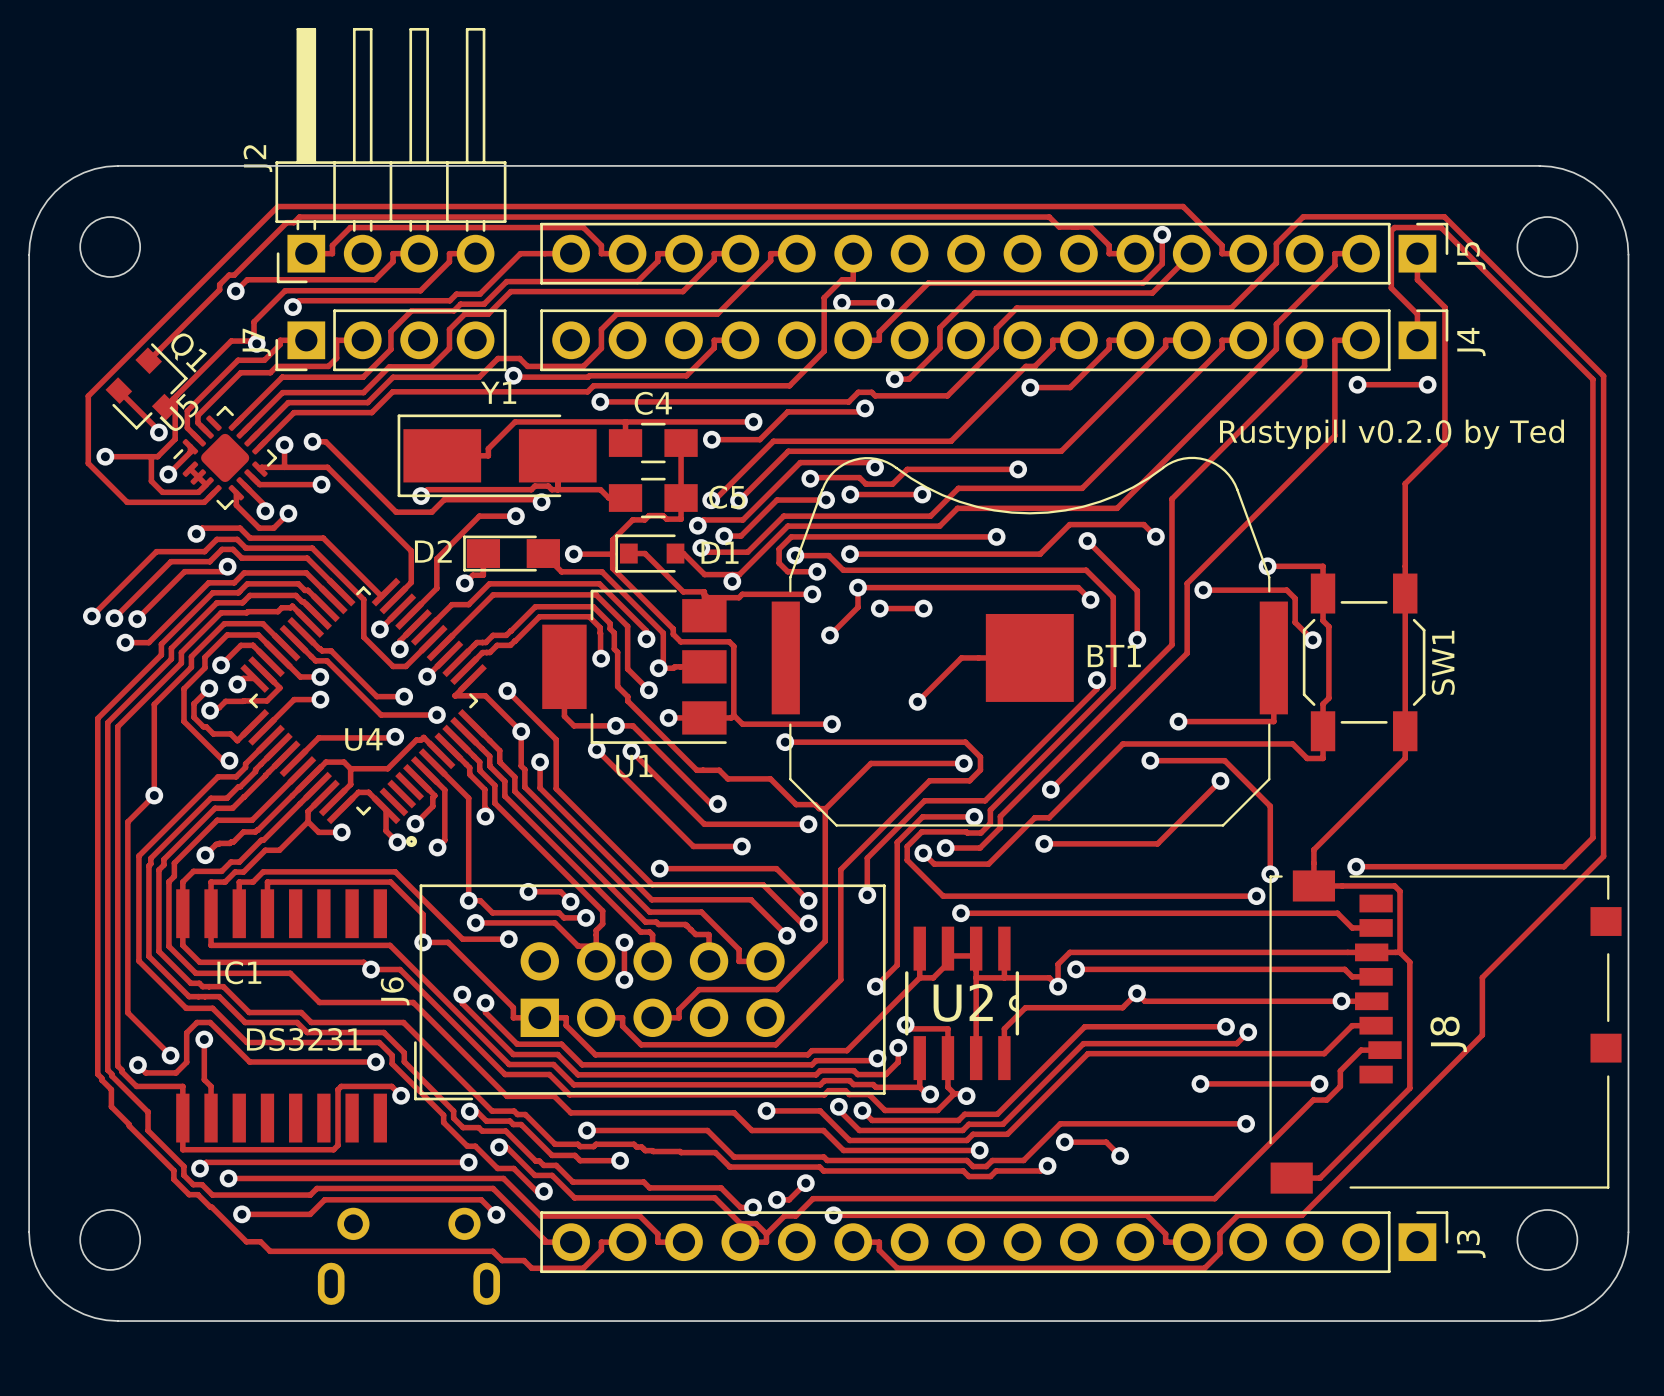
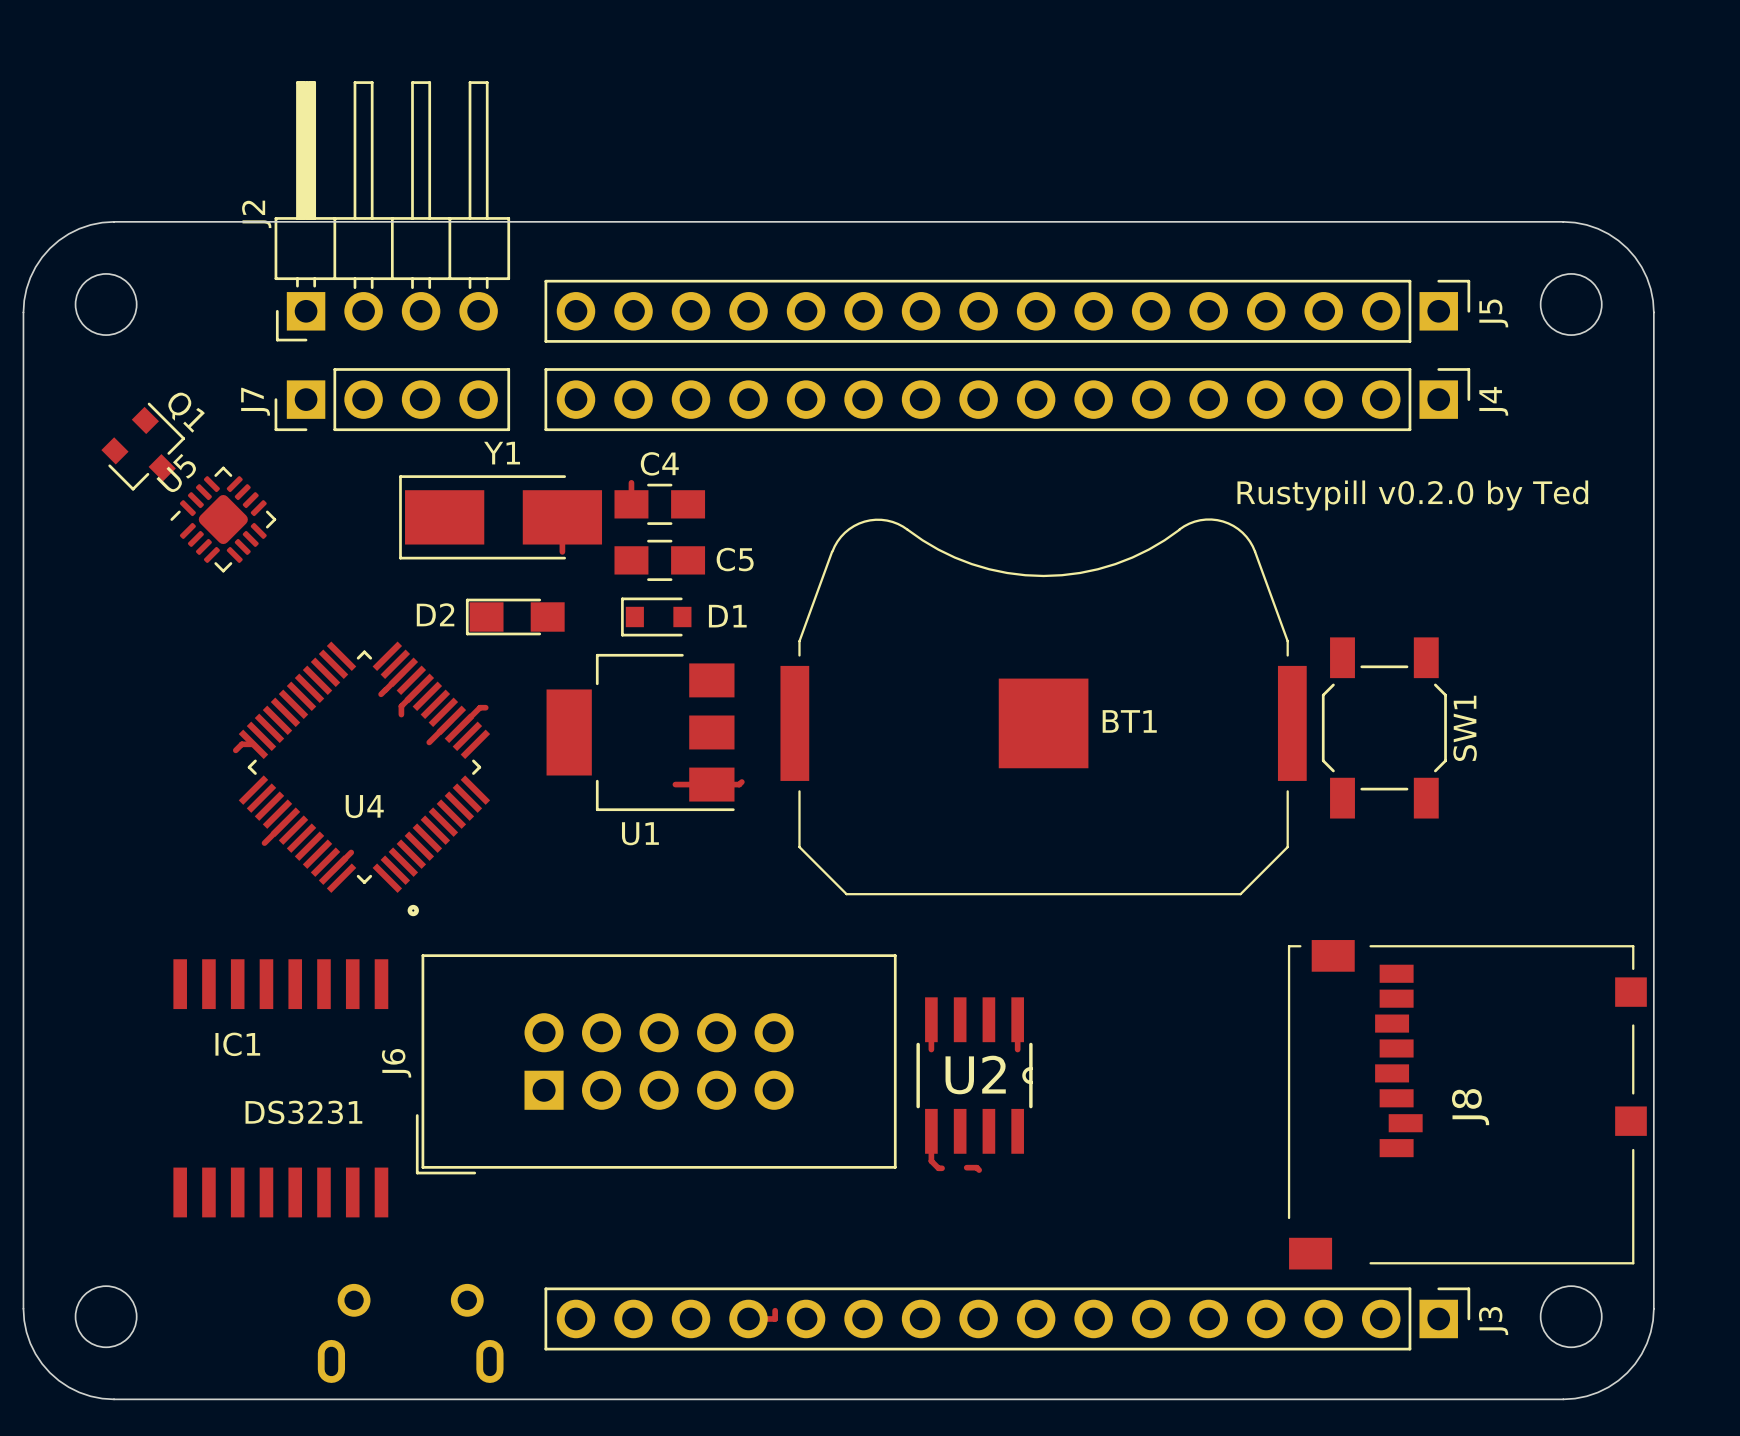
track: (1162, 234) (1162, 263) (1143, 283) (928, 283) (879, 332) (879, 340) (853, 340) -> none
via: (1162, 234) -> none
track: (306, 253) (332, 253) (332, 245) (350, 227) (583, 227) (601, 245) (601, 253) (627, 253) -> none
track: (419, 253) (393, 253) (393, 261) (375, 279) (247, 279) (235, 291) -> none
track: (475, 253) (449, 253) (449, 261) (420, 290) (285, 290) (254, 321) (254, 341) -> none
track: (571, 253) (520, 253) (479, 294) (456, 294) (449, 300) (299, 300) (292, 307) -> none
track: (683, 253) (657, 253) (657, 261) (637, 281) (506, 281) (484, 304) (460, 304) (453, 310) (411, 310) (390, 331) (390, 349) (363, 377) (282, 377) (236, 423) -> none
track: (740, 253) (714, 253) (714, 260) (682, 291) (510, 291) (488, 314) (464, 314) (449, 329) (449, 348) (431, 366) (389, 366) (363, 392) (282, 392) (244, 431) -> none
track: (796, 253) (770, 253) (770, 260) (717, 314) (616, 314) (601, 329) (601, 348) (583, 366) (527, 366) (519, 358) (498, 358) (479, 377) (393, 377) (367, 402) (288, 402) (252, 438) -> none
track: (853, 253) (853, 279) (842, 279) (824, 297) (824, 351) (789, 385) (593, 385) (587, 391) (392, 391) (371, 412) (294, 412) (259, 446) -> none
track: (1135, 253) (1109, 253) (1109, 245) (1090, 227) (1059, 227) (1049, 217) (299, 217) (293, 222) (286, 222) (234, 275) (229, 275) (219, 284) (219, 289) (148, 360) -> none
track: (1191, 253) (1152, 293) (974, 293) (939, 327) (939, 348) (908, 379) (894, 379) -> none
track: (1248, 253) (1222, 253) (1222, 245) (1183, 206) (277, 206) (88, 396) (88, 463) (127, 502) (204, 502) (213, 492) -> none
track: (1361, 253) (1334, 253) (1334, 265) (1276, 324) (1276, 349) (1117, 508) (957, 508) (939, 526) (787, 526) (739, 574) (704, 574) (683, 553) (675, 553) -> none
track: (1417, 253) (1417, 279) (1444, 307) (1444, 444) (1405, 483) (1405, 758) (1313, 849) (1313, 885) (1394, 885) (1400, 891) (1400, 952) -> none
via: (235, 291) -> none
track: (841, 302) (885, 302) -> none
via: (841, 302) -> none
via: (885, 302) -> none
via: (292, 307) -> none
track: (306, 340) (280, 340) (280, 344) (264, 360) (238, 360) (187, 411) (187, 427) (198, 438) -> none
track: (362, 340) (336, 340) (336, 358) (328, 366) (276, 366) (270, 372) (240, 372) (197, 415) (197, 422) (206, 431) -> none
track: (740, 340) (714, 340) (714, 347) (686, 375) (513, 375) -> none
track: (1078, 340) (1052, 340) (1052, 348) (1034, 366) (1025, 366) (951, 441) (773, 441) (714, 500) (711, 500) -> none
track: (1135, 340) (1109, 340) (1109, 348) (1070, 387) (1030, 387) -> none
track: (1191, 340) (1165, 340) (1165, 346) (1061, 451) (788, 451) (739, 500) -> none
track: (1248, 340) (1222, 340) (1222, 348) (1082, 488) (958, 488) (930, 516) (783, 516) (747, 552) (705, 552) (701, 547) -> none
track: (1304, 340) (1304, 366) (1171, 499) (1171, 644) (1000, 816) (1000, 827) (980, 848) (945, 848) -> none
track: (1361, 340) (1334, 340) (1334, 435) (1187, 583) (1187, 653) (1050, 789) -> none
track: (1417, 340) (1417, 314) (1391, 288) (1391, 230) (1394, 227) (1441, 227) (1592, 379) (1592, 837) (1564, 866) (1356, 866) -> none
track: (254, 341) (231, 341) (165, 407) -> none
via: (256, 343) -> none
via: (513, 375) -> none
via: (894, 379) -> none
track: (1357, 384) (1427, 384) -> none
via: (1357, 384) -> none
via: (1427, 384) -> none
via: (1030, 387) -> none
track: (118, 390) (158, 432) -> none
track: (173, 398) (175, 400) (175, 439) (157, 456) (105, 456) -> none
track: (600, 401) (848, 401) (858, 392) (871, 392) (875, 395) (947, 395) (996, 346) (996, 328) (1016, 308) (1231, 308) (1276, 262) (1276, 243) (1303, 216) (1444, 216) (1603, 375) (1603, 856) (1482, 977) (1482, 1035) (1302, 1215) (1237, 1215) (1219, 1233) (1219, 1252) (1204, 1268) (897, 1268) (879, 1250) (879, 1242) (853, 1242) -> none
via: (600, 401) -> none
track: (865, 408) (861, 411) (787, 411) (759, 439) (711, 439) -> none
via: (865, 408) -> none
track: (753, 421) (515, 421) (488, 448) (488, 455) (442, 455) -> none
via: (753, 421) -> none
via: (158, 432) -> none
via: (711, 439) -> none
track: (312, 441) (325, 441) (396, 512) (431, 512) (444, 499) (539, 499) (541, 502) -> none
via: (312, 441) -> none
track: (681, 443) (681, 519) (666, 519) (663, 516) -> none
track: (284, 444) (284, 467) -> none
via: (284, 444) -> none
track: (190, 446) (190, 452) (168, 474) -> none
via: (105, 456) -> none
track: (151, 456) (151, 481) (162, 492) (198, 492) (206, 484) (190, 469) -> none
track: (875, 467) (870, 462) (800, 462) (742, 519) (703, 519) (697, 525) -> none
via: (875, 467) -> none
track: (259, 469) (261, 467) (327, 467) (411, 551) (411, 582) (393, 599) -> none
track: (1018, 469) (907, 469) (892, 484) (865, 484) (859, 477) (810, 478) -> none
via: (1018, 469) -> none
via: (168, 474) -> none
track: (252, 476) (259, 484) (321, 484) -> none
via: (810, 478) -> none
track: (244, 484) (265, 506) (265, 511) -> none
via: (321, 484) -> none
track: (236, 492) (236, 505) (259, 528) (273, 528) (288, 513) -> none
track: (850, 494) (922, 494) -> none
via: (850, 494) -> none
via: (922, 494) -> none
track: (421, 496) (427, 489) (531, 489) (534, 486) (548, 486) (551, 489) (600, 489) (608, 498) (625, 498) -> none
via: (421, 496) -> none
via: (711, 500) -> none
via: (739, 500) -> none
track: (826, 500) (777, 500) (740, 536) (724, 536) -> none
via: (826, 500) -> none
via: (541, 502) -> none
via: (265, 511) -> none
via: (288, 513) -> none
track: (515, 516) (479, 516) (436, 558) (436, 588) (409, 615) -> none
via: (515, 516) -> none
track: (662, 516) (649, 515) (644, 519) (632, 519) (612, 540) (612, 568) (673, 629) (673, 634) (680, 641) (729, 641) (733, 646) (733, 715) (742, 724) (832, 724) -> none
via: (697, 525) -> none
track: (196, 533) (202, 528) (240, 528) (250, 538) (323, 538) (381, 596) (386, 592) -> none
via: (196, 533) -> none
via: (724, 536) -> none
track: (996, 536) (791, 536) (779, 549) (779, 563) (787, 571) (817, 571) -> none
via: (996, 536) -> none
track: (1155, 536) (1143, 524) (1069, 524) (1040, 554) (850, 554) -> none
via: (1155, 536) -> none
track: (1087, 540) (1137, 590) (1137, 639) -> none
via: (1087, 540) -> none
via: (701, 547) -> none
track: (483, 553) (483, 575) (472, 575) (464, 583) -> none
track: (543, 553) (561, 571) (601, 571) (663, 633) (663, 663) (658, 668) (704, 666) -> none
track: (628, 553) (644, 553) (683, 591) (704, 591) (704, 615) -> none
track: (573, 554) (612, 554) -> none
via: (573, 554) -> none
via: (850, 554) -> none
track: (795, 555) (828, 555) (843, 570) (1086, 570) (1113, 597) (1113, 687) (990, 810) (990, 823) (980, 833) (921, 831) (907, 846) (907, 860) (943, 896) (1256, 896) -> none
via: (795, 555) -> none
track: (209, 561) (222, 549) (233, 549) (241, 558) (307, 558) (341, 592) -> none
track: (209, 561) (170, 561) (114, 618) -> none
track: (227, 566) (222, 571) (184, 571) (137, 619) -> none
via: (227, 566) -> none
track: (1267, 566) (1323, 566) (1323, 620) (1328, 626) (1328, 698) (1323, 704) (1323, 758) (1307, 758) (1292, 743) (1122, 743) (1049, 817) (1034, 817) (988, 864) (934, 864) (923, 853) -> none
via: (1267, 566) -> none
via: (817, 571) -> none
via: (732, 581) -> none
via: (464, 583) -> none
via: (858, 587) -> none
track: (1203, 590) (1286, 590) (1295, 598) (1295, 622) (1312, 640) -> none
via: (1203, 590) -> none
track: (704, 594) (707, 597) (738, 597) (742, 594) (812, 594) -> none
via: (812, 594) -> none
track: (333, 599) (306, 572) (244, 572) (234, 582) (208, 582) (148, 642) (125, 642) -> none
track: (1090, 599) (1078, 587) (858, 587) (858, 607) (830, 635) -> none
via: (1090, 599) -> none
track: (325, 607) (308, 590) (304, 590) (298, 583) (247, 583) (238, 592) (212, 592) (161, 644) (161, 654) (97, 718) (97, 1074) (111, 1089) (111, 1106) (173, 1170) (173, 1179) (189, 1194) (197, 1194) (246, 1241) (260, 1241) (270, 1251) (492, 1251) (502, 1260) (524, 1260) (531, 1268) (583, 1268) (601, 1250) (601, 1242) (627, 1242) -> none
track: (879, 608) (923, 608) -> none
via: (879, 608) -> none
via: (923, 608) -> none
track: (317, 615) (295, 595) (249, 595) (242, 602) (216, 602) (171, 648) (171, 659) (107, 722) (107, 1070) (148, 1112) (148, 1130) (183, 1166) (183, 1175) (193, 1184) (202, 1184) (212, 1195) (310, 1195) (316, 1188) (493, 1188) (545, 1242) (571, 1242) -> none
track: (91, 616) (156, 551) (204, 551) (216, 539) (237, 539) (245, 548) (312, 548) (363, 599) (363, 637) (393, 666) (405, 666) (433, 639) -> none
via: (91, 616) -> none
via: (114, 618) -> none
via: (137, 619) -> none
track: (309, 623) (292, 606) (281, 607) (277, 611) (221, 612) (181, 652) (181, 663) (117, 726) (117, 1065) (136, 1086) (182, 1086) (182, 1149) (333, 1149) (338, 1145) (338, 1089) (341, 1086) (391, 1086) (401, 1095) -> none
via: (379, 629) -> none
track: (510, 630) (506, 635) (493, 635) (485, 642) (482, 642) -> none
track: (511, 630) (535, 606) (593, 606) (610, 623) (610, 628) (614, 633) (614, 649) (617, 652) (617, 686) (627, 696) (627, 701) (696, 770) (719, 770) (727, 778) (770, 778) (796, 804) (815, 804) (819, 808) (825, 809) -> none
track: (301, 631) (322, 650) (331, 650) (376, 696) (404, 696) -> none
track: (425, 631) (451, 604) (468, 604) (489, 583) (599, 583) (646, 630) (646, 639) -> none
via: (830, 635) -> none
track: (294, 639) (315, 660) (326, 660) (381, 715) (436, 715) -> none
via: (646, 639) -> none
via: (1137, 639) -> none
track: (514, 640) (510, 645) (497, 645) (490, 652) (482, 652) (464, 670) -> none
track: (515, 640) (539, 616) (589, 616) (600, 627) (601, 658) -> none
via: (1312, 640) -> none
via: (125, 642) -> none
track: (286, 647) (262, 623) (224, 623) (191, 656) (191, 667) (154, 704) (154, 795) (127, 822) (127, 1012) (170, 1055) -> none
track: (441, 647) (493, 594) (596, 594) (627, 626) (627, 668) (648, 690) -> none
via: (399, 649) -> none
track: (1029, 657) (961, 657) (917, 701) -> none
track: (1273, 657) (1273, 721) (1178, 721) -> none
via: (601, 658) -> none
track: (270, 662) (253, 645) (240, 645) (221, 665) -> none
via: (221, 665) -> none
track: (564, 666) (564, 716) (574, 725) (632, 725) (711, 804) (717, 804) -> none
via: (658, 668) -> none
track: (262, 670) (279, 687) (267, 700) (225, 701) (219, 707) (212, 707) (210, 710) -> none
track: (320, 676) (300, 676) (258, 635) (227, 635) (204, 657) (204, 667) (183, 688) (183, 721) (223, 760) (229, 760) -> none
via: (320, 676) -> none
via: (427, 676) -> none
track: (472, 678) (455, 695) (485, 695) (521, 731) (521, 766) (524, 769) (524, 787) (649, 912) (701, 912) (739, 949) (739, 961) (765, 961) -> none
track: (1096, 680) (1096, 689) (985, 800) (924, 800) (867, 858) (867, 895) -> none
via: (1096, 680) -> none
via: (237, 684) -> none
track: (209, 688) (194, 703) (194, 717) (203, 726) (206, 726) (213, 733) (230, 733) (237, 740) (254, 723) -> none
via: (209, 688) -> none
track: (507, 690) (556, 739) (556, 788) (652, 884) (763, 884) (801, 923) (808, 923) -> none
via: (507, 690) -> none
via: (648, 690) -> none
via: (404, 696) -> none
track: (320, 699) (294, 699) (262, 731) -> none
via: (320, 699) -> none
via: (917, 701) -> none
via: (210, 710) -> none
via: (436, 715) -> none
via: (668, 717) -> none
via: (1178, 721) -> none
track: (472, 723) (499, 750) (500, 762) -> none
via: (832, 724) -> none
via: (615, 725) -> none
track: (464, 731) (489, 756) (490, 766) -> none
via: (521, 731) -> none
track: (395, 736) (318, 737) (294, 762) -> none
via: (395, 736) -> none
track: (270, 739) (245, 763) (245, 767) (236, 776) (218, 776) (138, 856) (138, 960) (186, 1008) (212, 1008) (246, 1042) (379, 1042) (392, 1055) (392, 1063) (443, 1115) (443, 1122) (467, 1146) (475, 1146) (497, 1168) (513, 1168) (536, 1191) (543, 1191) -> none
track: (456, 739) (479, 762) (480, 770) -> none
track: (785, 742) (965, 742) (980, 757) (980, 769) (969, 780) (929, 780) (840, 869) (840, 979) (775, 1044) (641, 1044) (622, 1026) (622, 1017) (596, 1017) -> none
via: (785, 742) -> none
track: (278, 746) (226, 798) (210, 798) (150, 858) (148, 865) (148, 956) (189, 996) (219, 996) (245, 1022) (297, 1022) (307, 1032) (383, 1032) (404, 1052) (404, 1061) (453, 1111) (453, 1118) (463, 1127) (478, 1127) (482, 1131) (505, 1131) (535, 1161) (539, 1161) (543, 1165) (556, 1165) (572, 1182) (643, 1182) (649, 1187) (721, 1187) (740, 1207) (753, 1207) -> none
track: (448, 746) (469, 767) (470, 774) -> none
track: (596, 749) (693, 846) (741, 846) -> none
via: (596, 749) -> none
track: (631, 751) (704, 824) (808, 824) -> none
via: (631, 751) -> none
track: (441, 754) (423, 737) (421, 740) (416, 740) (387, 768) (350, 768) -> none
via: (229, 760) -> none
track: (1150, 760) (1224, 760) (1270, 806) (1270, 874) -> none
via: (1150, 760) -> none
track: (433, 762) (468, 798) (468, 900) (480, 900) (492, 912) (558, 912) (563, 917) (585, 917) -> none
track: (500, 762) (514, 777) (514, 791) (645, 922) (656, 922) (658, 924) (685, 924) (695, 934) (708, 934) (709, 961) -> none
track: (540, 762) (540, 788) (651, 899) (751, 899) (787, 935) -> none
via: (540, 762) -> none
track: (963, 763) (870, 763) (825, 809) -> none
via: (963, 763) -> none
track: (490, 766) (504, 781) (504, 796) (640, 932) (649, 932) (652, 934) (652, 961) -> none
track: (350, 768) (343, 762) (325, 762) (257, 830) (243, 831) (229, 843) (216, 844) (205, 855) -> none
track: (350, 768) (350, 784) -> none
track: (301, 770) (252, 820) (217, 820) (174, 863) (174, 876) (168, 881) (168, 946) (195, 973) (290, 973) (319, 1002) (413, 1002) (507, 1096) (554, 1096) (570, 1112) (734, 1112) (751, 1130) (823, 1130) (843, 1150) (979, 1150) -> none
track: (425, 770) (444, 790) (444, 840) (437, 847) -> none
track: (480, 770) (494, 785) (494, 803) (602, 910) (602, 923) (596, 930) (596, 961) -> none
track: (265, 775) (244, 796) -> none
track: (470, 775) (484, 789) (484, 807) (488, 813) (485, 816) -> none
track: (417, 778) (434, 795) (432, 797) (432, 806) (415, 823) -> none
track: (1220, 780) (1157, 843) (1044, 843) -> none
via: (1220, 780) -> none
track: (317, 786) (239, 862) (230, 862) (221, 871) (193, 871) (182, 882) (182, 945) (199, 962) (363, 962) (371, 969) (400, 969) (505, 1074) (549, 1074) (569, 1094) (824, 1094) (828, 1090) (845, 1090) (849, 1094) (869, 1094) (885, 1110) (937, 1110) (954, 1093) (947, 1087) (947, 1028) (909, 1028) (905, 1024) -> none
via: (1050, 789) -> none
track: (325, 794) (308, 811) (308, 821) -> none
via: (154, 795) -> none
track: (244, 796) (232, 808) (215, 808) (163, 859) (163, 864) (158, 869) (158, 951) (190, 983) (199, 983) (202, 986) (223, 986) (249, 1012) (301, 1012) (311, 1022) (403, 1022) (492, 1111) (514, 1111) (517, 1114) (525, 1114) (555, 1144) (577, 1144) (580, 1146) (593, 1146) (596, 1144) (634, 1144) (645, 1150) (653, 1151) (715, 1152) (729, 1167) (819, 1167) (823, 1170) (963, 1170) (968, 1176) (990, 1176) (996, 1170) (1040, 1170) (1047, 1165) -> none
via: (717, 804) -> none
track: (341, 809) (358, 792) (368, 792) (386, 809) (386, 830) (397, 842) -> none
track: (825, 809) (825, 941) (776, 989) (699, 989) (679, 1009) (679, 1017) (652, 1017) -> none
via: (485, 816) -> none
track: (974, 816) (922, 816) (897, 842) (897, 965) (875, 986) -> none
via: (974, 816) -> none
track: (308, 821) (279, 850) (265, 850) (243, 872) (235, 872) (225, 882) (211, 882) (211, 945) (390, 945) (509, 1064) (553, 1064) (573, 1084) (820, 1084) (824, 1080) (849, 1080) (853, 1084) (873, 1084) (876, 1087) (919, 1087) -> none
track: (308, 821) (318, 832) (341, 832) -> none
via: (415, 823) -> none
via: (808, 824) -> none
via: (341, 832) -> none
via: (397, 842) -> none
via: (1044, 843) -> none
via: (741, 846) -> none
via: (437, 847) -> none
via: (945, 848) -> none
via: (923, 853) -> none
via: (205, 855) -> none
via: (1356, 866) -> none
track: (659, 868) (776, 868) (808, 900) -> none
via: (659, 868) -> none
via: (1270, 874) -> none
track: (528, 891) (560, 891) (570, 901) -> none
via: (528, 891) -> none
via: (867, 895) -> none
via: (1256, 896) -> none
via: (468, 900) -> none
via: (808, 900) -> none
via: (570, 901) -> none
track: (239, 913) (239, 882) (253, 882) (263, 871) (395, 871) (462, 939) (508, 939) -> none
track: (267, 913) (267, 882) (390, 882) (423, 914) (423, 942) (448, 942) (513, 1007) (513, 1017) (566, 1017) (566, 1025) (595, 1054) (807, 1054) (811, 1050) (846, 1050) (919, 977) (933, 977) (947, 963) (947, 948) -> none
track: (960, 913) (1337, 913) (1352, 927) (1376, 927) -> none
via: (960, 913) -> none
via: (585, 917) -> none
track: (475, 922) (554, 922) (578, 946) (596, 946) -> none
via: (475, 922) -> none
via: (808, 923) -> none
via: (787, 935) -> none
via: (508, 939) -> none
via: (423, 942) -> none
track: (624, 942) (624, 979) -> none
via: (624, 942) -> none
track: (976, 948) (976, 1058) -> none
track: (1400, 952) (1069, 952) (1058, 964) (1058, 986) (1049, 977) (976, 977) -> none
track: (1400, 952) (1409, 962) (1409, 1088) (1320, 1178) (1291, 1178) -> none
track: (947, 955) (976, 955) -> none
via: (371, 969) -> none
track: (1076, 969) (1344, 969) (1352, 976) (1376, 976) -> none
via: (1076, 969) -> none
via: (624, 979) -> none
via: (875, 986) -> none
via: (1058, 986) -> none
via: (1136, 993) -> none
track: (462, 994) (462, 1003) (513, 1054) (557, 1054) (578, 1074) (816, 1074) (820, 1070) (853, 1070) (857, 1074) (885, 1074) (898, 1062) (898, 1047) -> none
via: (462, 994) -> none
via: (1341, 1001) -> none
track: (1371, 1001) (1144, 1001) (1136, 993) (1122, 1007) (1025, 1007) (1004, 1028) (1004, 1058) -> none
track: (485, 1003) (485, 1012) (517, 1044) (561, 1044) (582, 1064) (811, 1064) (816, 1060) (875, 1060) (877, 1058) -> none
via: (485, 1003) -> none
via: (905, 1024) -> none
track: (1376, 1025) (1352, 1025) (1324, 1053) (1088, 1053) (1007, 1134) (973, 1134) (966, 1140) (849, 1140) (820, 1110) (766, 1110) -> none
track: (1226, 1026) (1084, 1026) (997, 1114) (964, 1114) (958, 1120) (872, 1120) (862, 1110) -> none
via: (1226, 1026) -> none
track: (1248, 1032) (1236, 1043) (1083, 1043) (1002, 1124) (968, 1124) (962, 1130) (859, 1130) (838, 1109) (838, 1106) -> none
via: (1248, 1032) -> none
track: (204, 1039) (204, 1079) (211, 1086) (211, 1118) -> none
via: (204, 1039) -> none
via: (898, 1047) -> none
track: (1385, 1050) (1361, 1050) (1340, 1070) (1340, 1086) (1326, 1100) (1313, 1100) (1214, 1198) (813, 1198) (795, 1215) (784, 1215) (766, 1234) (756, 1223) (740, 1223) (714, 1197) (574, 1197) (552, 1175) (534, 1175) (506, 1147) (499, 1147) -> none
via: (170, 1055) -> none
via: (877, 1058) -> none
track: (375, 1062) (249, 1062) (210, 1022) (197, 1022) (186, 1032) (186, 1062) (176, 1072) (145, 1072) (137, 1065) -> none
via: (375, 1062) -> none
via: (137, 1065) -> none
track: (1200, 1083) (1319, 1083) -> none
via: (1200, 1083) -> none
via: (1319, 1083) -> none
via: (930, 1094) -> none
via: (401, 1095) -> none
via: (966, 1096) -> none
via: (838, 1106) -> none
via: (766, 1110) -> none
via: (862, 1110) -> none
track: (469, 1111) (476, 1111) (486, 1121) (509, 1121) (513, 1124) (521, 1124) (552, 1155) (574, 1155) (580, 1160) (620, 1160) -> none
via: (469, 1111) -> none
track: (1246, 1123) (1060, 1123) (1023, 1160) (992, 1160) (986, 1166) (973, 1166) (966, 1160) (827, 1160) (823, 1157) (734, 1157) (707, 1130) (587, 1130) -> none
via: (1246, 1123) -> none
via: (587, 1130) -> none
track: (1064, 1142) (1106, 1142) (1120, 1156) -> none
via: (1064, 1142) -> none
via: (499, 1147) -> none
via: (979, 1150) -> none
via: (1120, 1156) -> none
via: (620, 1160) -> none
track: (468, 1162) (206, 1162) (200, 1168) -> none
via: (468, 1162) -> none
via: (1047, 1165) -> none
via: (200, 1168) -> none
track: (228, 1178) (503, 1178) (541, 1216) (639, 1216) (657, 1234) (657, 1242) (683, 1242) -> none
via: (228, 1178) -> none
track: (805, 1183) (789, 1199) (776, 1199) -> none
via: (805, 1183) -> none
via: (543, 1191) -> none
via: (776, 1199) -> none
via: (753, 1207) -> none
track: (242, 1214) (310, 1214) (324, 1199) (481, 1199) (496, 1214) -> none
via: (242, 1214) -> none
via: (496, 1214) -> none
track: (833, 1215) (1146, 1215) (1165, 1234) (1165, 1242) (1191, 1242) -> none
via: (833, 1215) -> none

